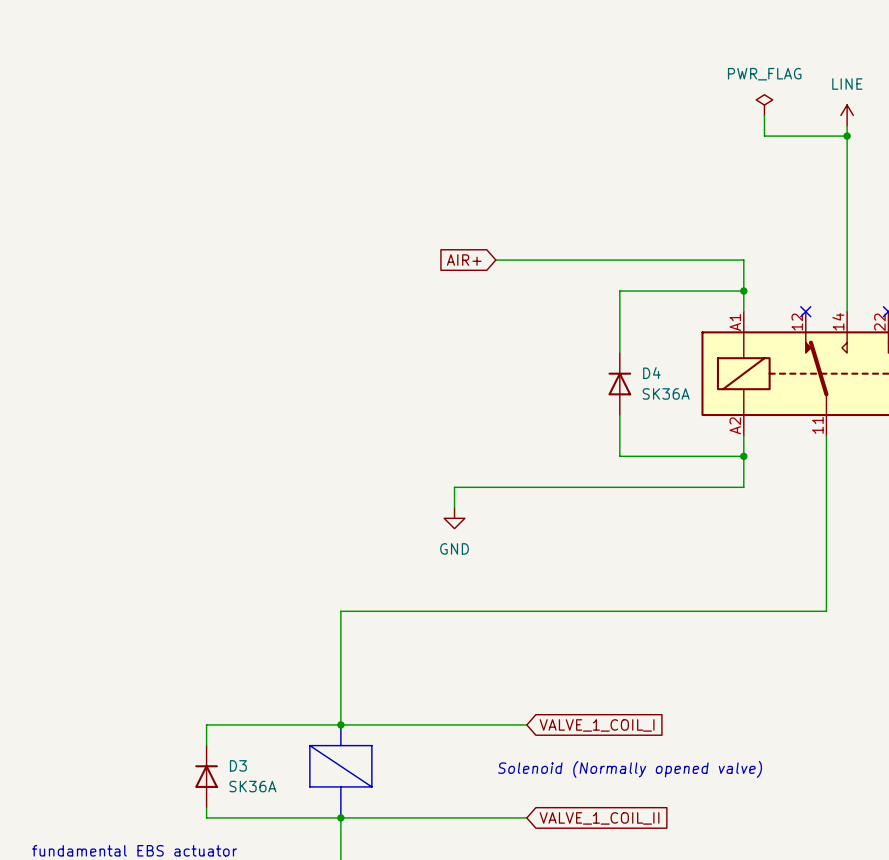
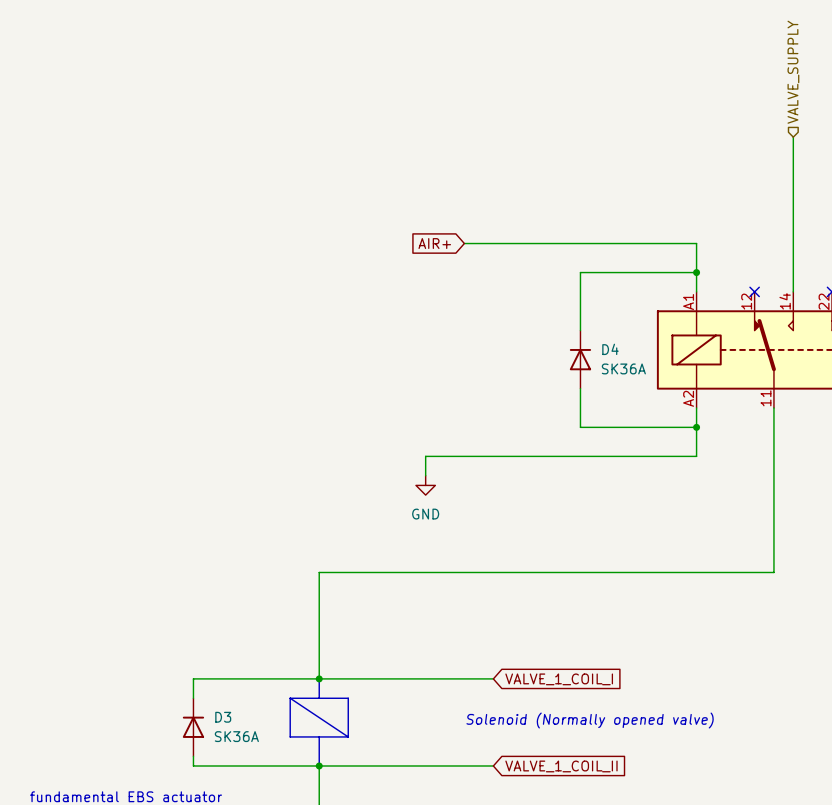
hierarchical label: none -> VALVE_SUPPLY (793, 72)
power symbol: PWR_FLAG (764, 105) -> none
wire: (764, 115) (764, 136) (847, 136) -> none
power symbol: LINE (847, 115) -> none
wire: (847, 125) (847, 146) -> none
junction: (847, 136) -> none

